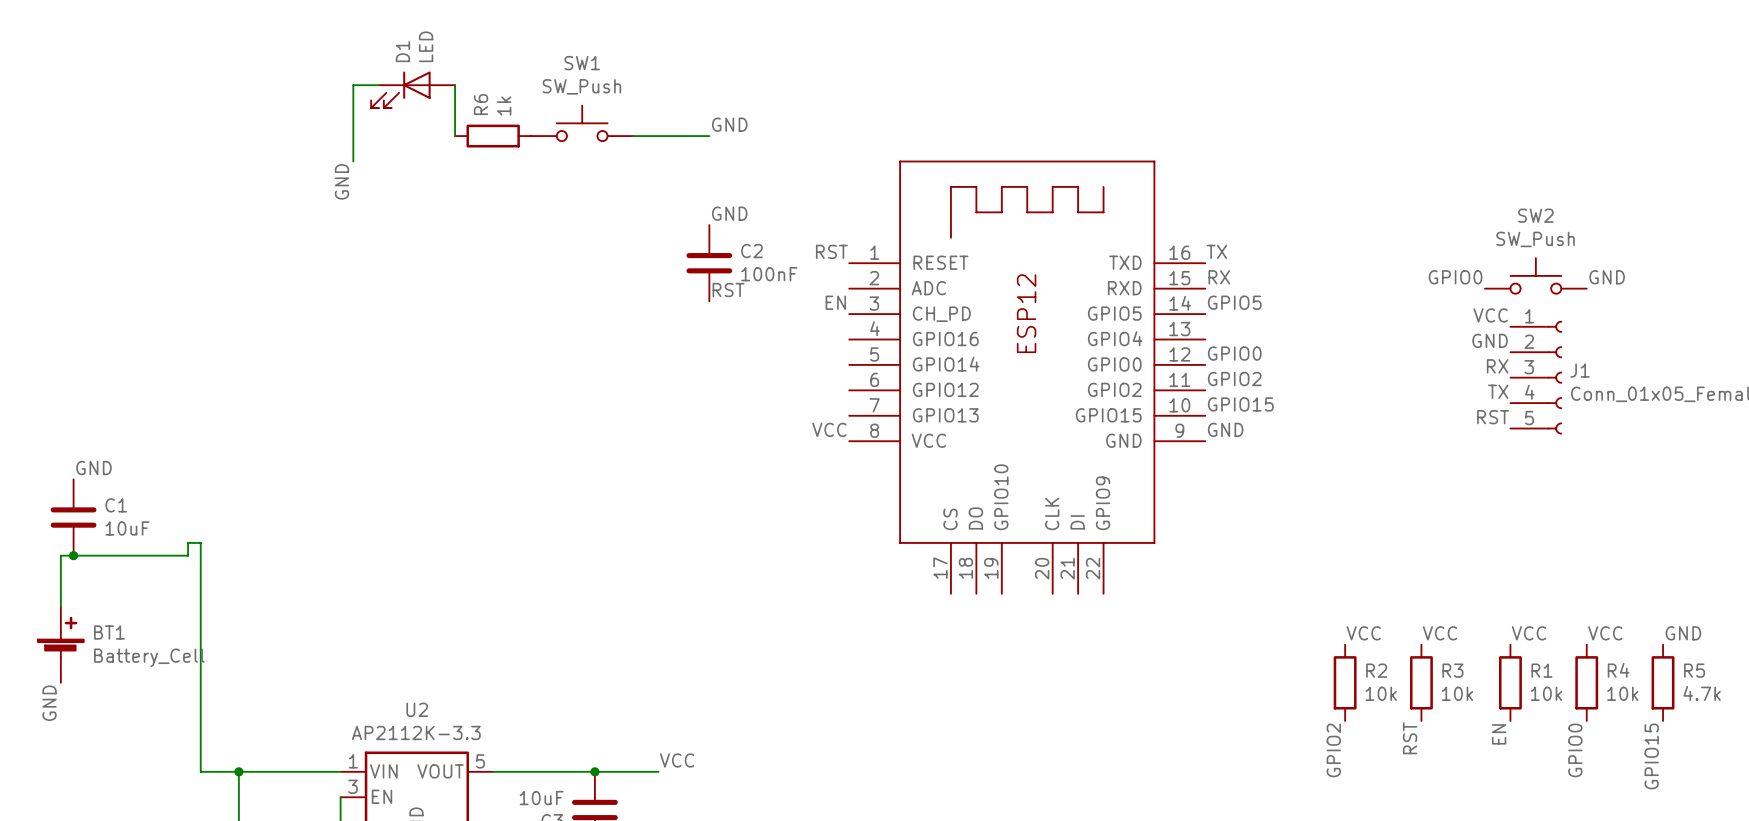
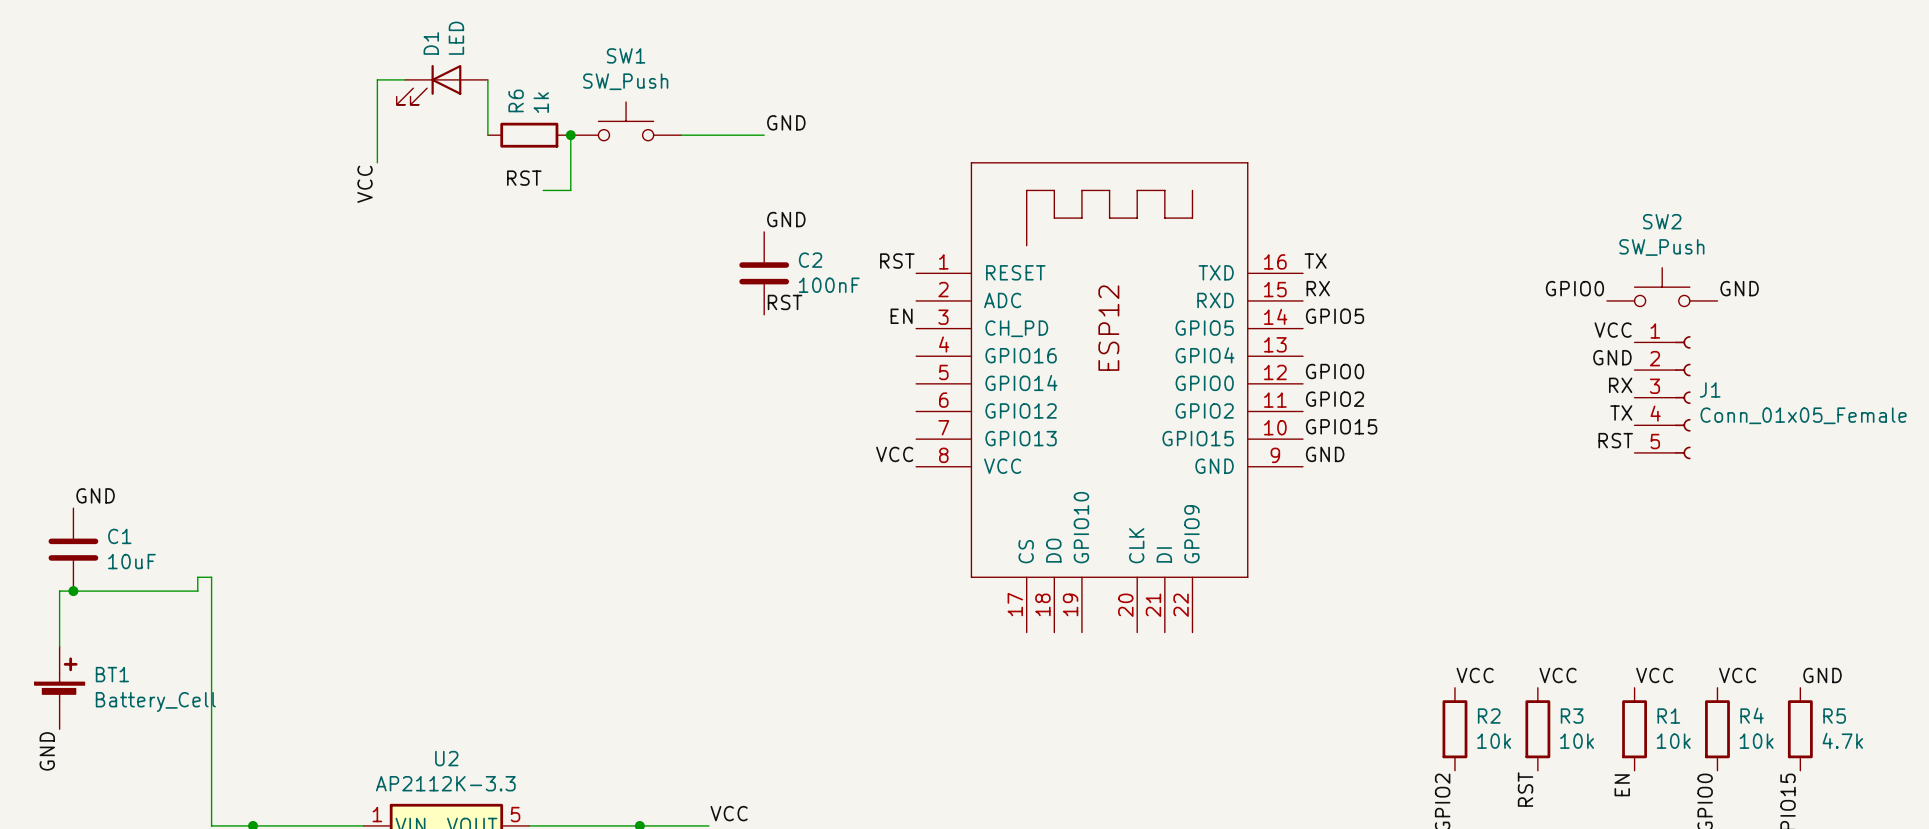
wire: none -> (570, 135) (570, 190) (543, 190)
junction: none -> (570, 135)
label: none -> RST (524, 178)
label: GND (341, 181) -> VCC (365, 184)

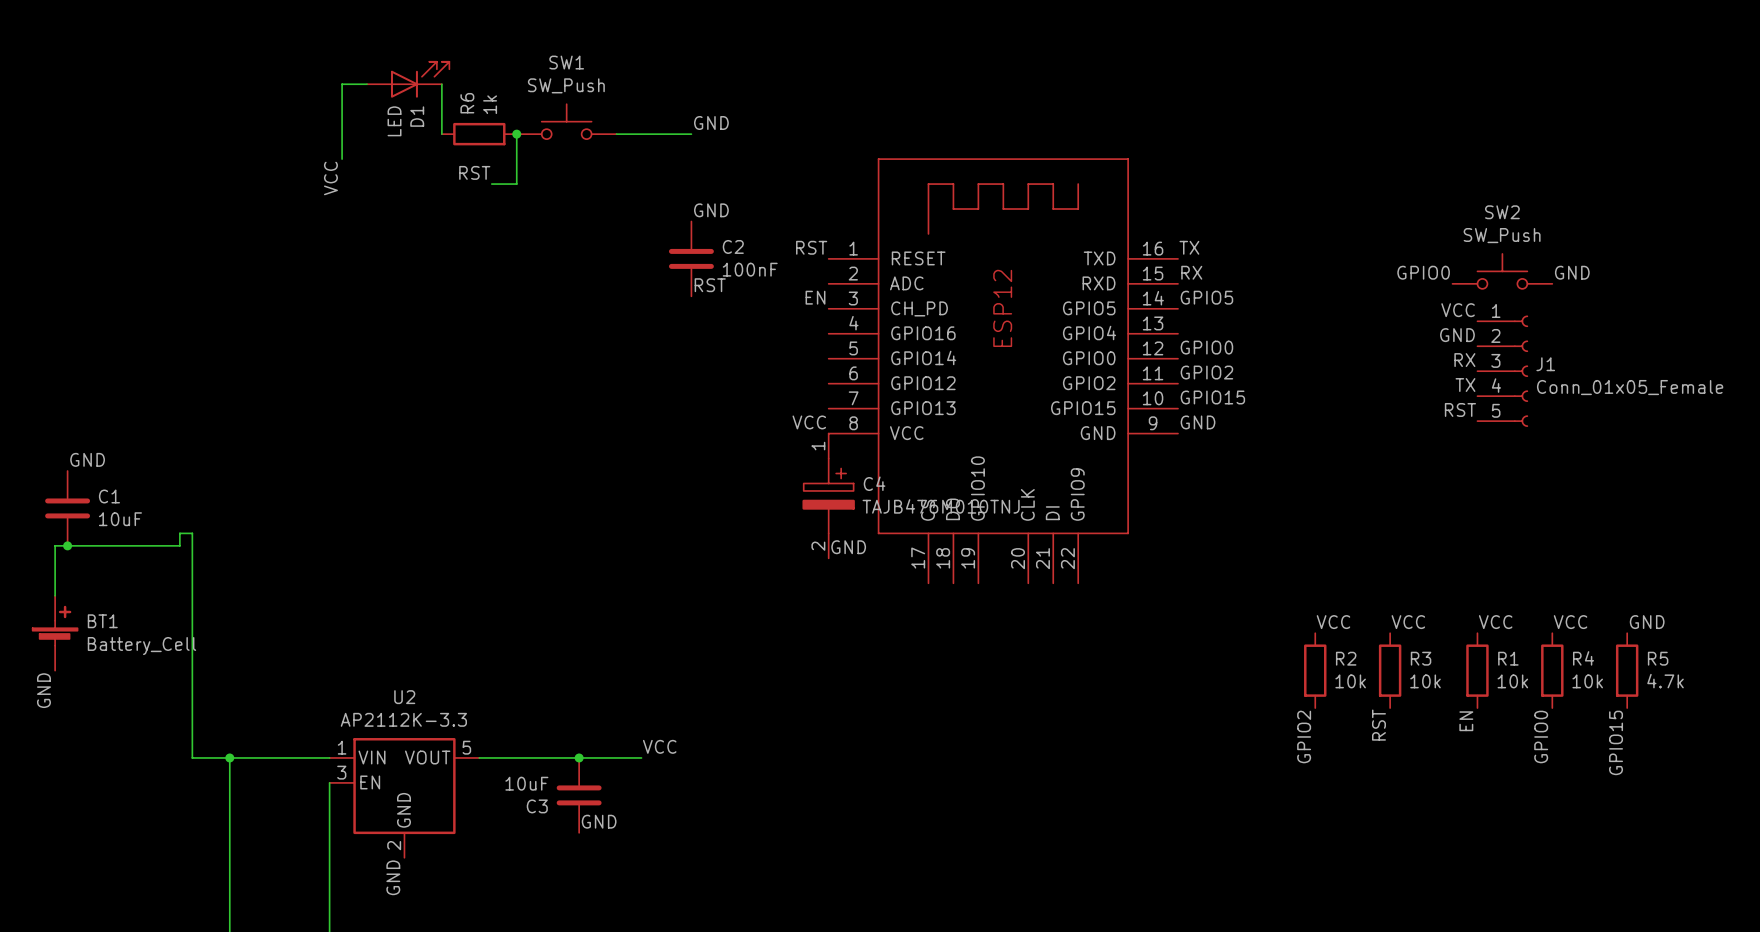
D1 rotation: 0° (429, 84) -> 180° (420, 79)
C4: none -> TAJB476M010TNJ (828, 495)
label: none -> GND (848, 547)

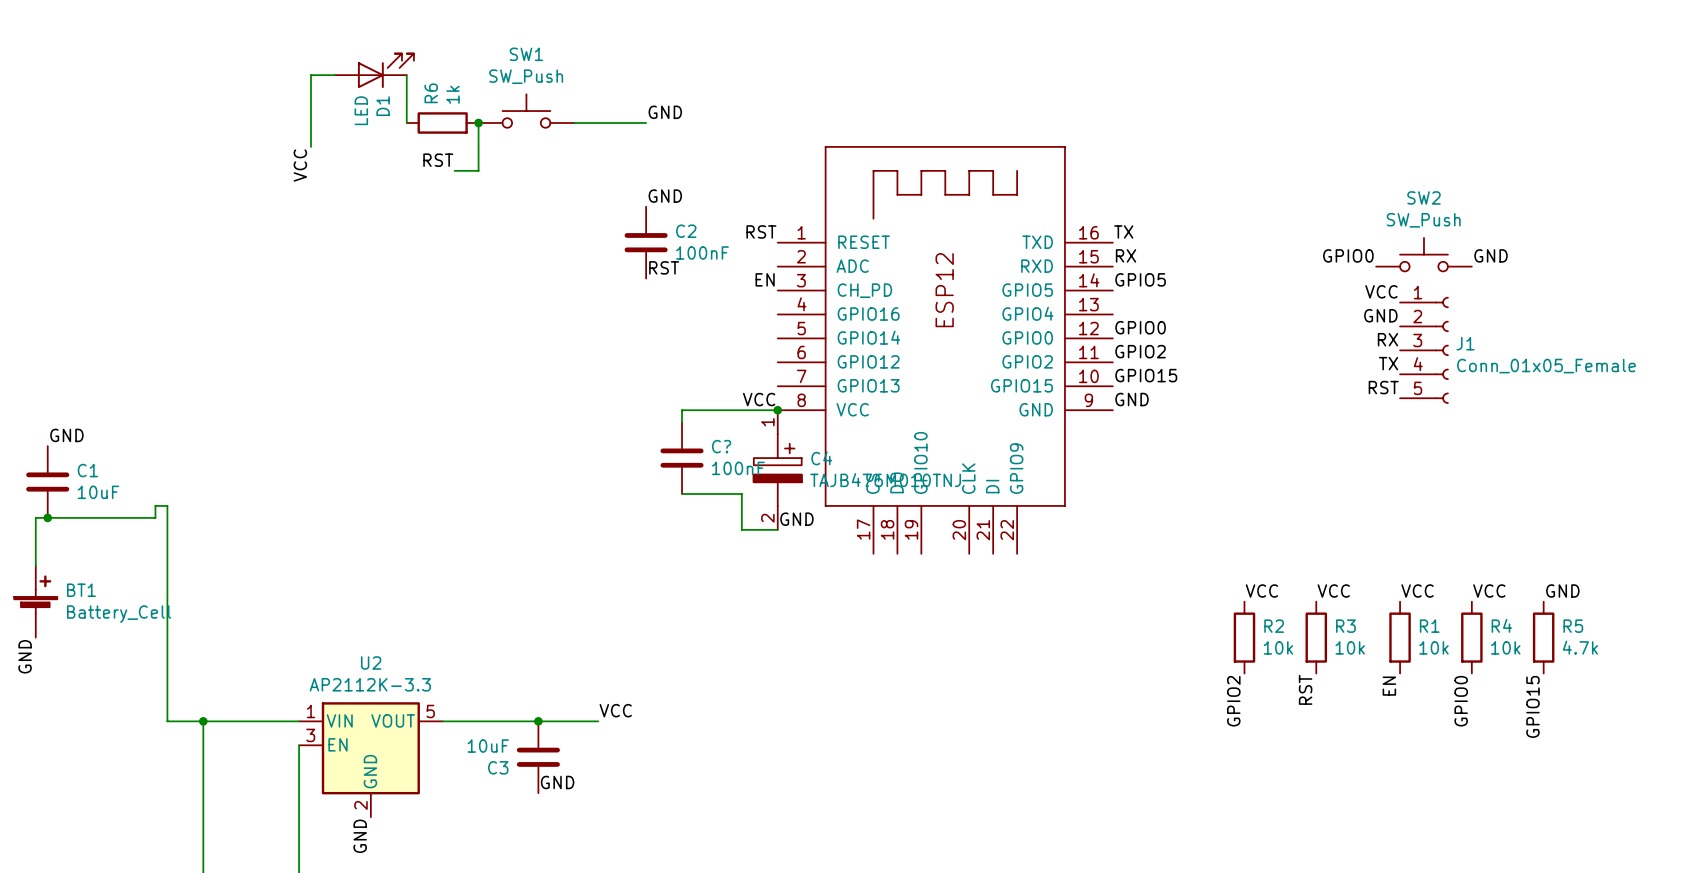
wire: none -> (777, 410) (682, 410) (682, 422)
junction: none -> (777, 410)
C?: none -> 100nF (682, 458)
wire: none -> (682, 493) (741, 493) (741, 529) (777, 529)

